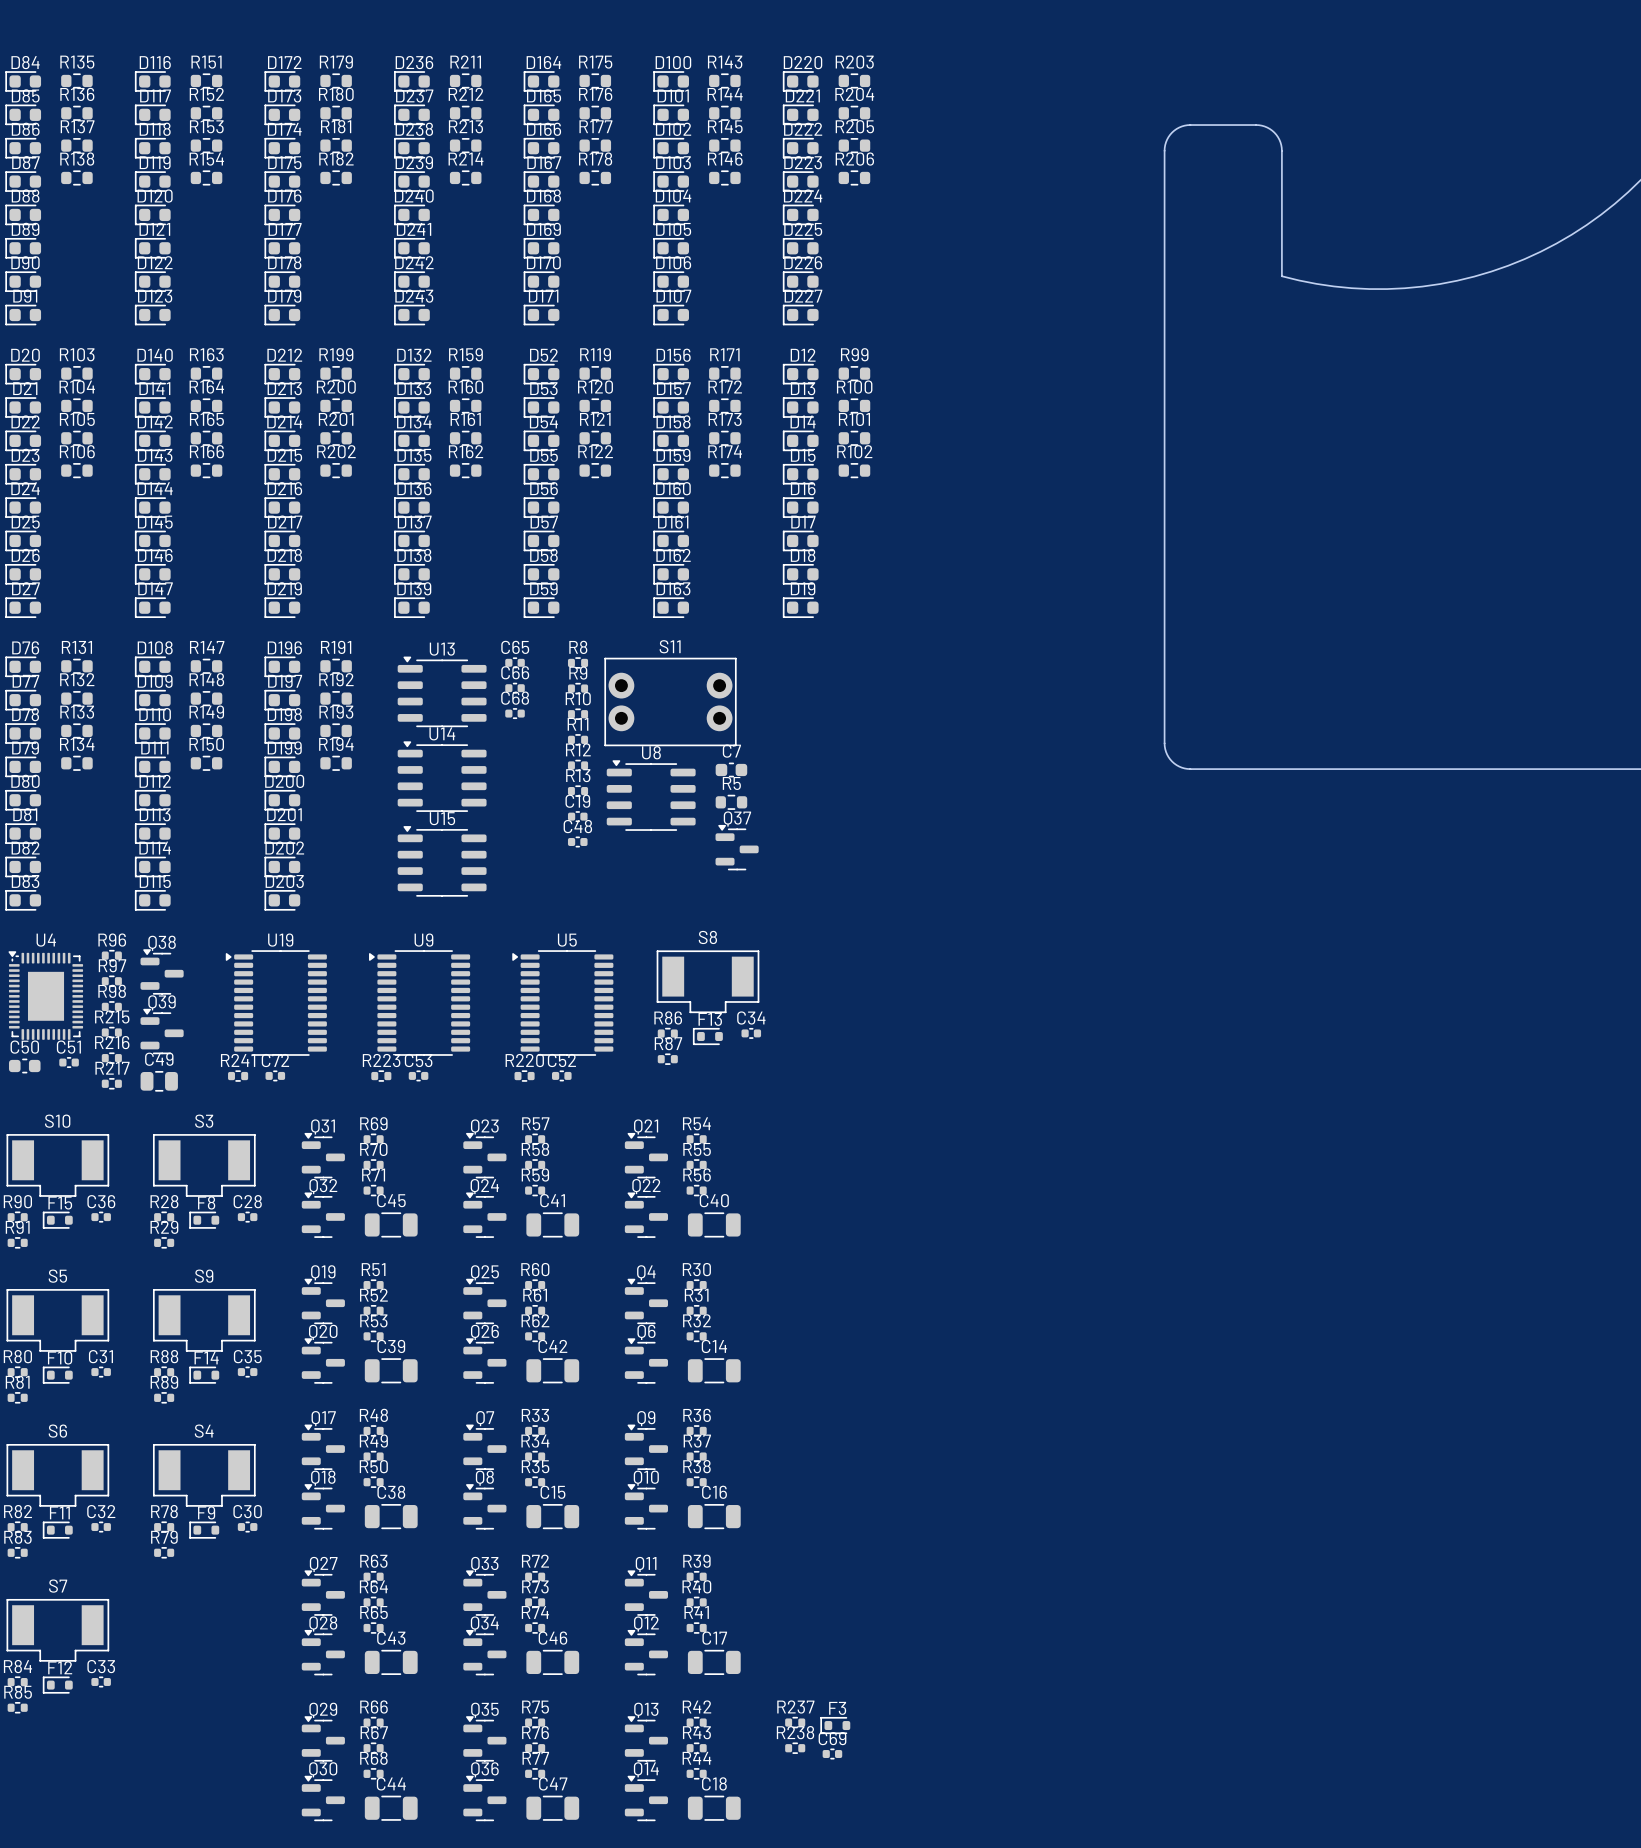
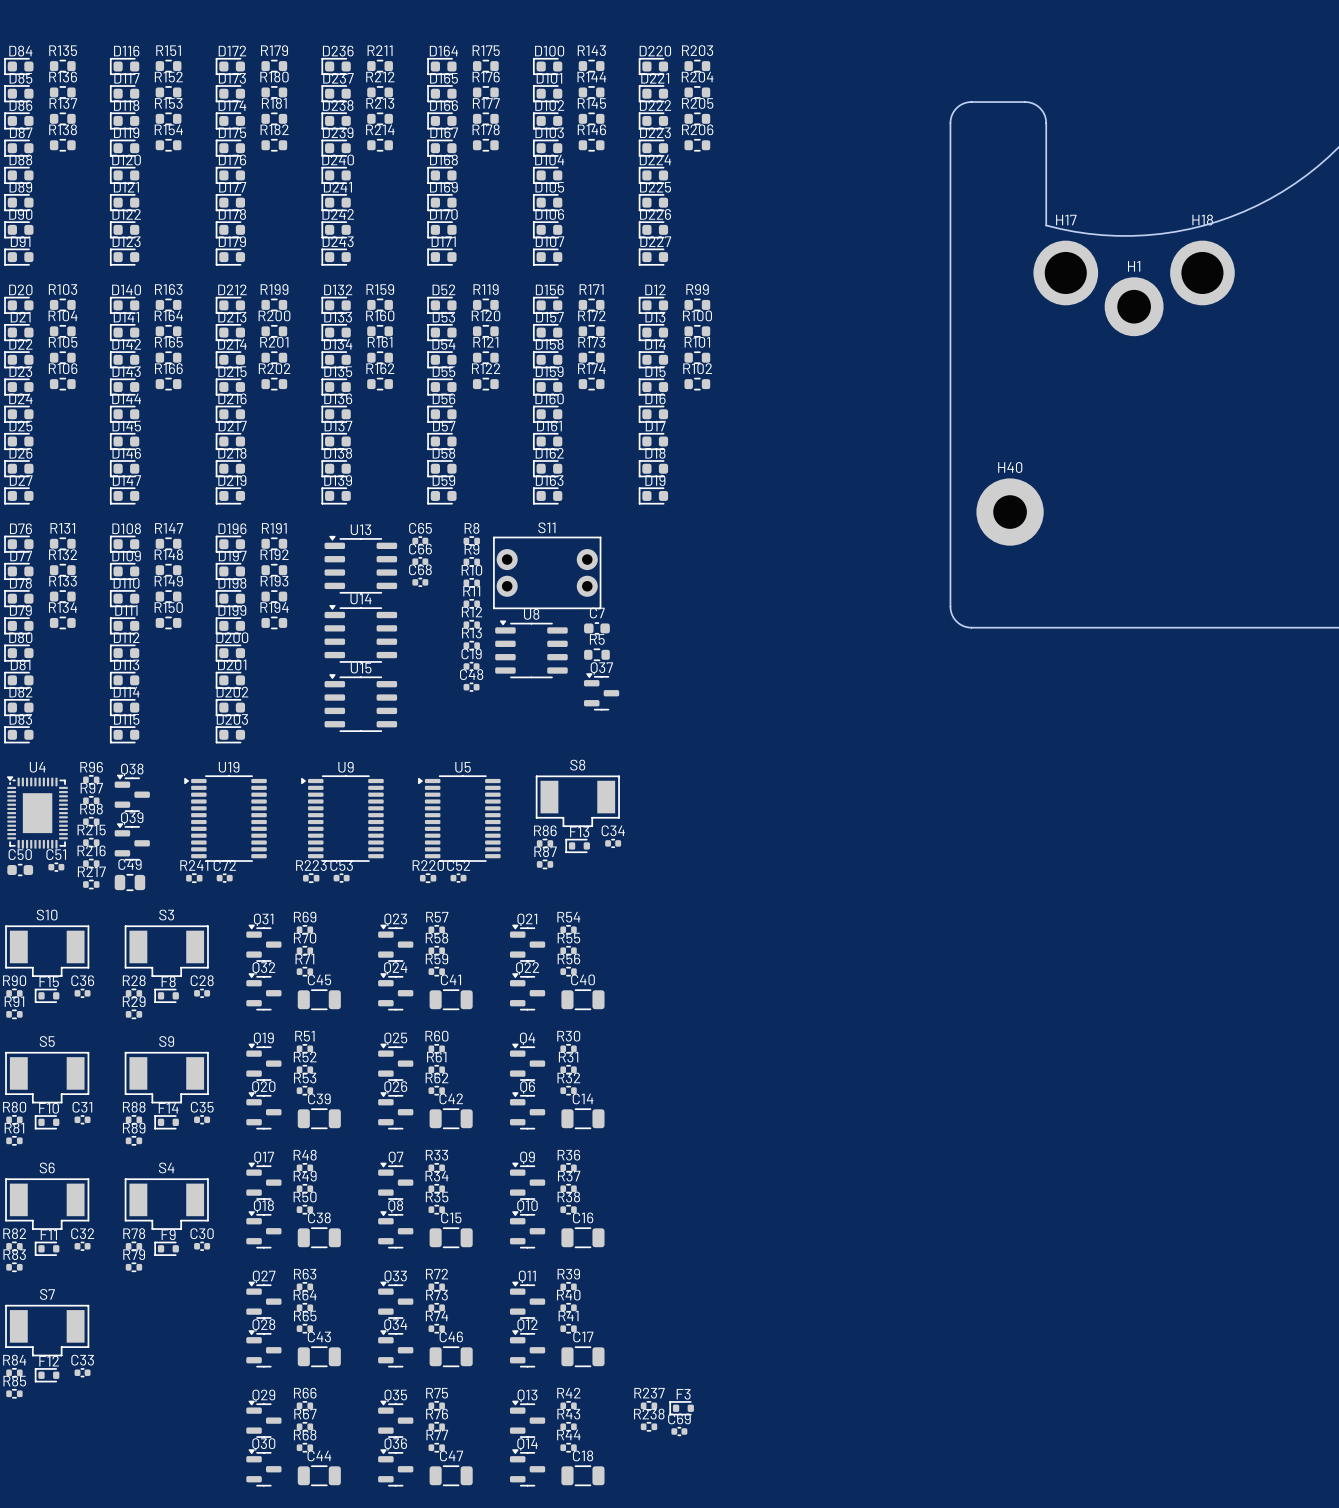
H17: none -> (1065, 272)
H18: none -> (1202, 272)
H1: none -> (1134, 306)
H40: none -> (1010, 512)

